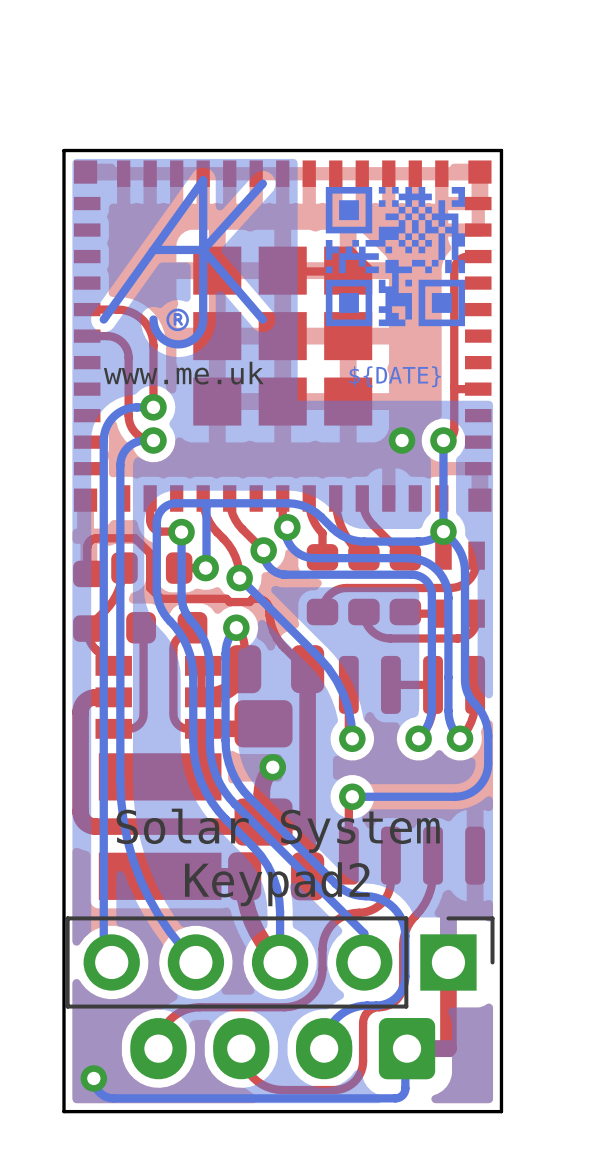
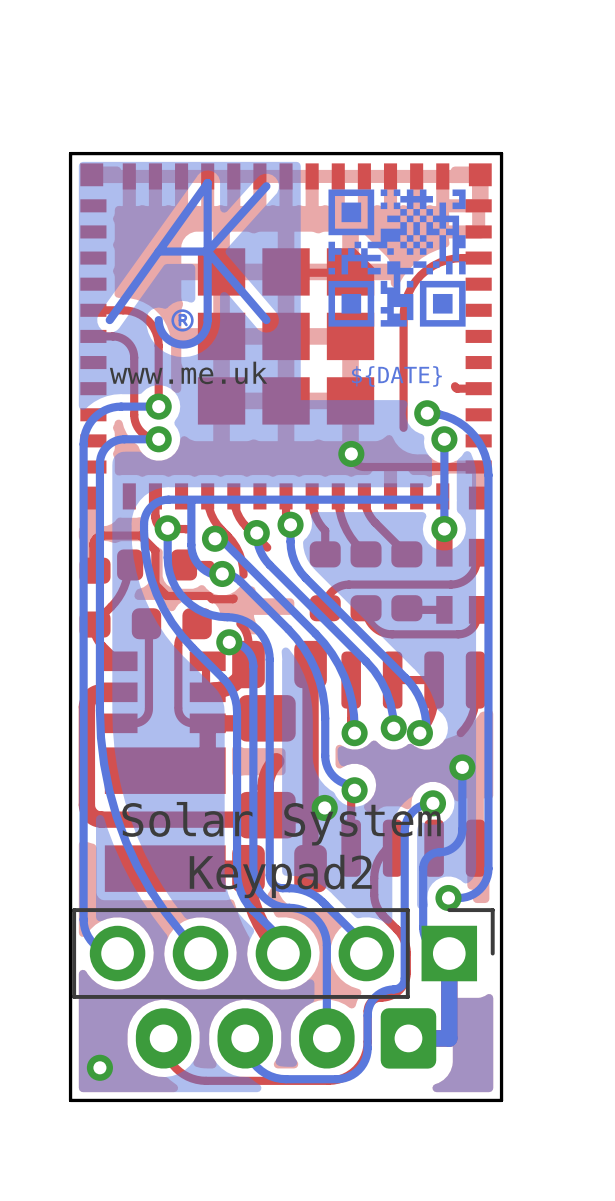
top track: (468, 256) (459, 259) (454, 269) (454, 429) (451, 437) (443, 440) -> (468, 258) (447, 260) (432, 265) (415, 281) (408, 294) (403, 316) (403, 427)
bottom track: (136, 407) (122, 410) (113, 417) (105, 429) (103, 440) (103, 954) (106, 960) (111, 962) -> (142, 406) (116, 406) (101, 412) (89, 424) (83, 444) (83, 923) (88, 936) (93, 943) (104, 950) (117, 953)
bottom track: none -> (427, 413) (446, 416) (464, 426) (478, 441) (486, 461) (488, 475) (488, 730)
via: none -> (427, 413)
bottom track: (145, 440) (130, 445) (123, 452) (120, 462) (121, 800) (127, 840) (139, 878) (158, 914) (169, 931) (195, 962) -> (150, 439) (115, 441) (104, 448) (100, 460) (100, 737) (109, 790) (126, 842) (150, 890) (165, 912) (200, 953)
via: (402, 440) -> none
top track: none -> (351, 453) (355, 463) (362, 466) (478, 467)
via: none -> (351, 453)
bottom track: none -> (191, 502) (191, 544) (193, 556) (205, 571) (213, 574) (221, 574)
bottom track: (206, 505) (205, 568) -> none
bottom track: none -> (290, 523) (290, 548) (297, 567) (305, 578) (410, 683) (423, 707) (426, 728)
bottom track: (287, 527) (286, 537) (289, 544) (297, 552) (306, 557) (413, 558) (428, 563) (440, 573) (445, 582) (448, 597) (448, 714) (453, 729) (460, 738) -> none
bottom track: (181, 532) (183, 606) (200, 633) (209, 658) (210, 752) (216, 776) (224, 791) (234, 804) (364, 933) (364, 962) -> (167, 528) (168, 565) (172, 580) (180, 593) (191, 604) (204, 612) (236, 618) (249, 623) (260, 633) (267, 645) (269, 659) (271, 880) (278, 887) (303, 890) (319, 898) (362, 941) (366, 953)
via position: (181, 532) -> (167, 528)
bottom track: none -> (256, 533) (258, 546) (266, 561) (374, 670) (381, 680) (390, 703) (393, 728)
bottom track: none -> (215, 538) (224, 542) (315, 633) (332, 653) (348, 689) (354, 728)
via: none -> (215, 538)
bottom track: (263, 550) (264, 559) (270, 568) (276, 572) (286, 574) -> none
via position: (263, 550) -> (256, 533)
via: (205, 568) -> none
bottom track: (283, 574) (411, 574) (421, 577) (427, 582) (431, 594) (431, 711) (428, 724) (418, 738) -> none
bottom track: none -> (222, 573) (232, 575) (240, 581) (288, 629) (303, 648) (315, 670) (322, 693) (325, 755) (327, 767) (339, 781) (354, 785)
via: none -> (222, 573)
bottom track: (239, 578) (328, 668) (336, 680) (348, 708) (352, 738) -> none
via: (239, 578) -> none
top track: (160, 598) (226, 598) (229, 602) (249, 602) (252, 598) (261, 599) (268, 606) (270, 623) (277, 638) (305, 669) -> (166, 595) (208, 595) (212, 599) (233, 598)
bottom track: (236, 627) (228, 639) (225, 653) (225, 748) (229, 763) (235, 778) (249, 797) (339, 887) (354, 894) (375, 897) (385, 901) (397, 911) (404, 925) (405, 976) (400, 991) (394, 999) (385, 1003) (357, 1006) (340, 1014) (328, 1029) (324, 1048) -> (229, 642) (238, 644) (246, 649) (253, 663) (254, 881) (260, 893) (267, 900) (280, 906) (305, 911) (315, 918) (323, 929) (326, 945) (326, 1038)
via position: (236, 627) -> (229, 642)
via: none -> (393, 728)
bottom track: (488, 735) (484, 718) (469, 695) (465, 683) (464, 562) (457, 546) (443, 531) (435, 537) (422, 541) (358, 541) (347, 538) (336, 532) (311, 509) (294, 503) (176, 503) (162, 508) (156, 520) (157, 593) (162, 610) (183, 639) (191, 661) (193, 751) (198, 772) (212, 802) (260, 855) (273, 876) (279, 899) (280, 962) -> (444, 499) (168, 499) (155, 503) (145, 516) (144, 530) (147, 563) (156, 594) (163, 608) (181, 635) (227, 683) (235, 699) (237, 879) (244, 899) (278, 936) (283, 953)
via: (460, 738) -> none
bottom track: (488, 763) (486, 774) (480, 784) (472, 791) (462, 795) (352, 796) -> (488, 757) (487, 876) (482, 886) (473, 894) (462, 897) (448, 898)
via: (272, 767) -> none
via: none -> (462, 767)
bottom track: none -> (432, 803) (415, 809) (405, 824) (404, 980) (399, 987) (380, 992) (371, 1002) (367, 1012) (367, 1052) (361, 1067) (352, 1075) (340, 1078) (275, 1077) (265, 1073) (253, 1063) (246, 1048) (245, 1038)
via: none -> (432, 803)
via: none -> (324, 807)
top track: none -> (392, 843) (382, 853) (375, 867) (374, 898) (380, 912) (399, 932) (404, 940) (406, 949) (406, 975) (399, 990) (391, 995) (381, 997)
top track: (390, 855) (390, 884) (384, 900) (371, 910) (340, 917) (327, 930) (322, 944) (321, 978) (314, 992) (307, 999) (289, 1006) (189, 1008) (179, 1012) (167, 1023) (161, 1032) (158, 1048) -> (381, 997) (372, 1000) (368, 1007) (367, 1046) (362, 1061) (348, 1075) (333, 1080) (196, 1079) (183, 1074) (172, 1064) (165, 1052) (163, 1038)
top track: (433, 855) (432, 881) (428, 896) (408, 925) (403, 937) (401, 992) (391, 1004) (372, 1008) (364, 1016) (362, 1064) (360, 1073) (354, 1081) (346, 1087) (337, 1089) (272, 1088) (262, 1084) (249, 1073) (242, 1059) (241, 1048) -> none
via: none -> (448, 898)
bottom track: (407, 1048) (405, 1050) (405, 1090) (402, 1095) (396, 1098) (113, 1098) (106, 1096) (99, 1092) (95, 1086) (93, 1078) -> (408, 1038) (449, 1038) (449, 953) (433, 948) (424, 934) (423, 868) (425, 860) (429, 855) (451, 848) (461, 836) (462, 767)

